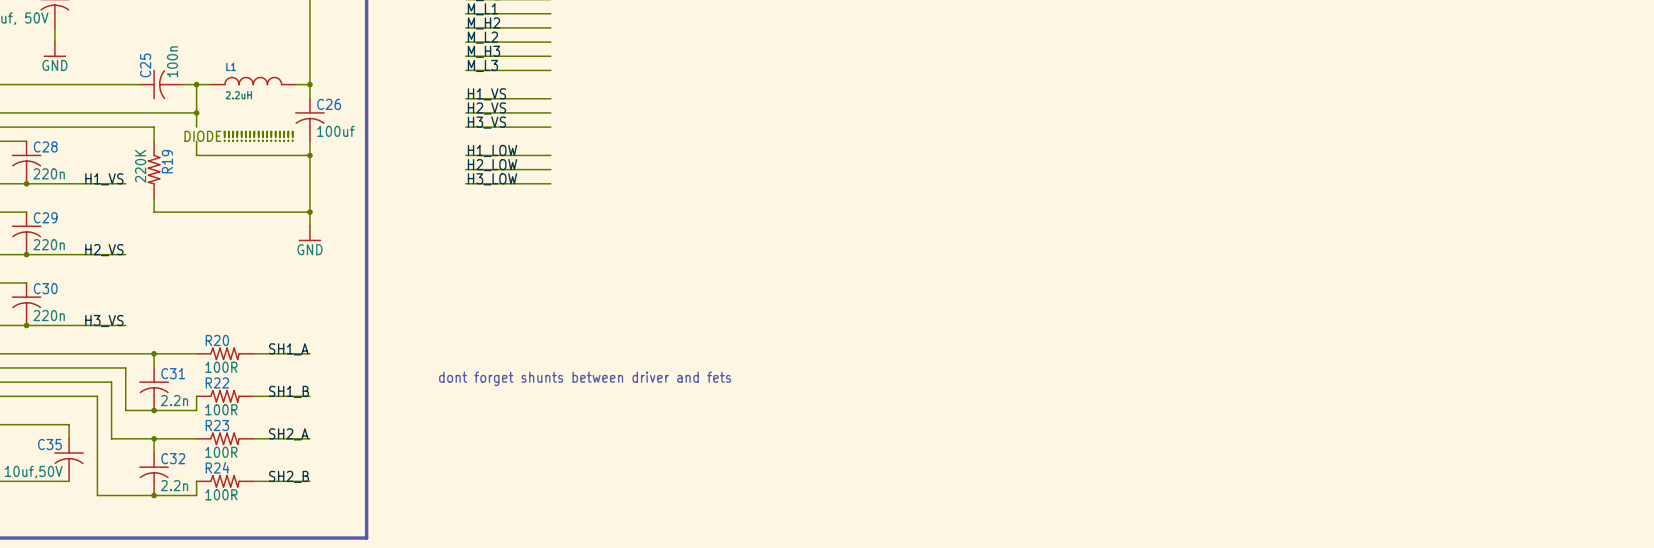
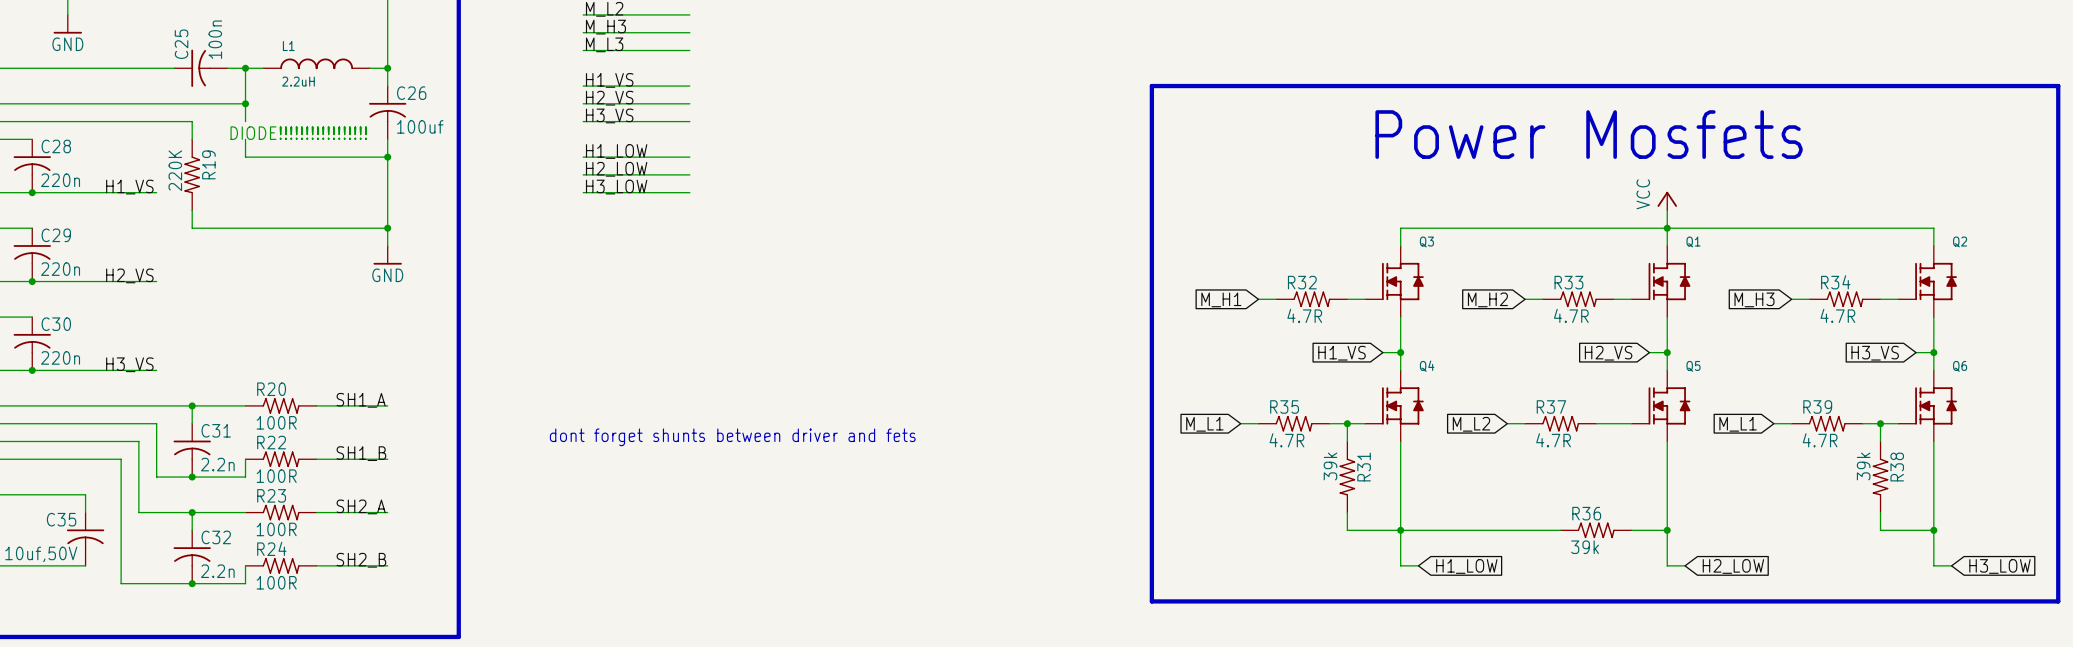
line: none -> (1151, 86) (2058, 86) (2058, 601) (1151, 601) (1151, 86)
text: none -> Power Mosfets (1589, 134)
power symbol: none -> VCC (1667, 201)
wire: none -> (1667, 210) (1667, 245)
junction: none -> (1667, 228)
wire: none -> (1400, 245) (1400, 228) (1933, 228) (1933, 245)
Q3: none -> (1394, 281)
Q1: none -> (1661, 281)
Q2: none -> (1927, 281)
wire: none -> (1258, 299) (1276, 299)
R32: none -> 4.7R (1311, 299)
wire: none -> (1347, 299) (1365, 299)
wire: none -> (1525, 299) (1542, 299)
R33: none -> 4.7R (1578, 299)
wire: none -> (1613, 299) (1631, 299)
wire: none -> (1791, 299) (1809, 299)
R34: none -> 4.7R (1844, 299)
wire: none -> (1880, 299) (1898, 299)
global label: none -> M_H1 (1221, 299)
global label: none -> M_H2 (1487, 299)
global label: none -> M_H3 (1754, 299)
wire: none -> (1400, 317) (1400, 370)
wire: none -> (1667, 317) (1667, 370)
wire: none -> (1933, 317) (1933, 370)
global label: none -> H1_VS (1342, 353)
wire: none -> (1382, 352) (1400, 352)
junction: none -> (1400, 352)
global label: none -> H2_VS (1608, 353)
wire: none -> (1649, 352) (1667, 352)
junction: none -> (1667, 352)
global label: none -> H3_VS (1875, 353)
wire: none -> (1916, 352) (1933, 352)
junction: none -> (1933, 352)
Q4: none -> (1394, 405)
Q5: none -> (1661, 405)
Q6: none -> (1927, 405)
wire: none -> (1240, 423) (1258, 423)
R35: none -> 4.7R (1294, 423)
wire: none -> (1329, 423) (1365, 423)
wire: none -> (1347, 423) (1347, 441)
junction: none -> (1347, 423)
wire: none -> (1507, 423) (1525, 423)
R37: none -> 4.7R (1560, 423)
wire: none -> (1596, 423) (1631, 423)
wire: none -> (1773, 423) (1791, 423)
R39: none -> 4.7R (1827, 423)
wire: none -> (1862, 423) (1898, 423)
wire: none -> (1880, 423) (1880, 441)
junction: none -> (1880, 423)
global label: none -> M_L1 (1204, 424)
global label: none -> M_L2 (1471, 424)
global label: none -> M_L1 (1738, 424)
wire: none -> (1400, 441) (1400, 565) (1418, 565)
wire: none -> (1667, 441) (1667, 565) (1685, 565)
wire: none -> (1933, 441) (1933, 565) (1951, 565)
R31: none -> 39k (1347, 477)
R38: none -> 39k (1880, 477)
wire: none -> (1347, 512) (1347, 530) (1560, 530)
wire: none -> (1880, 512) (1880, 530) (1933, 530)
junction: none -> (1400, 530)
R36: none -> 39k (1596, 530)
wire: none -> (1631, 530) (1667, 530)
junction: none -> (1667, 530)
junction: none -> (1933, 530)
global label: none -> H1_LOW (1466, 566)
global label: none -> H2_LOW (1733, 566)
global label: none -> H3_LOW (1999, 566)

